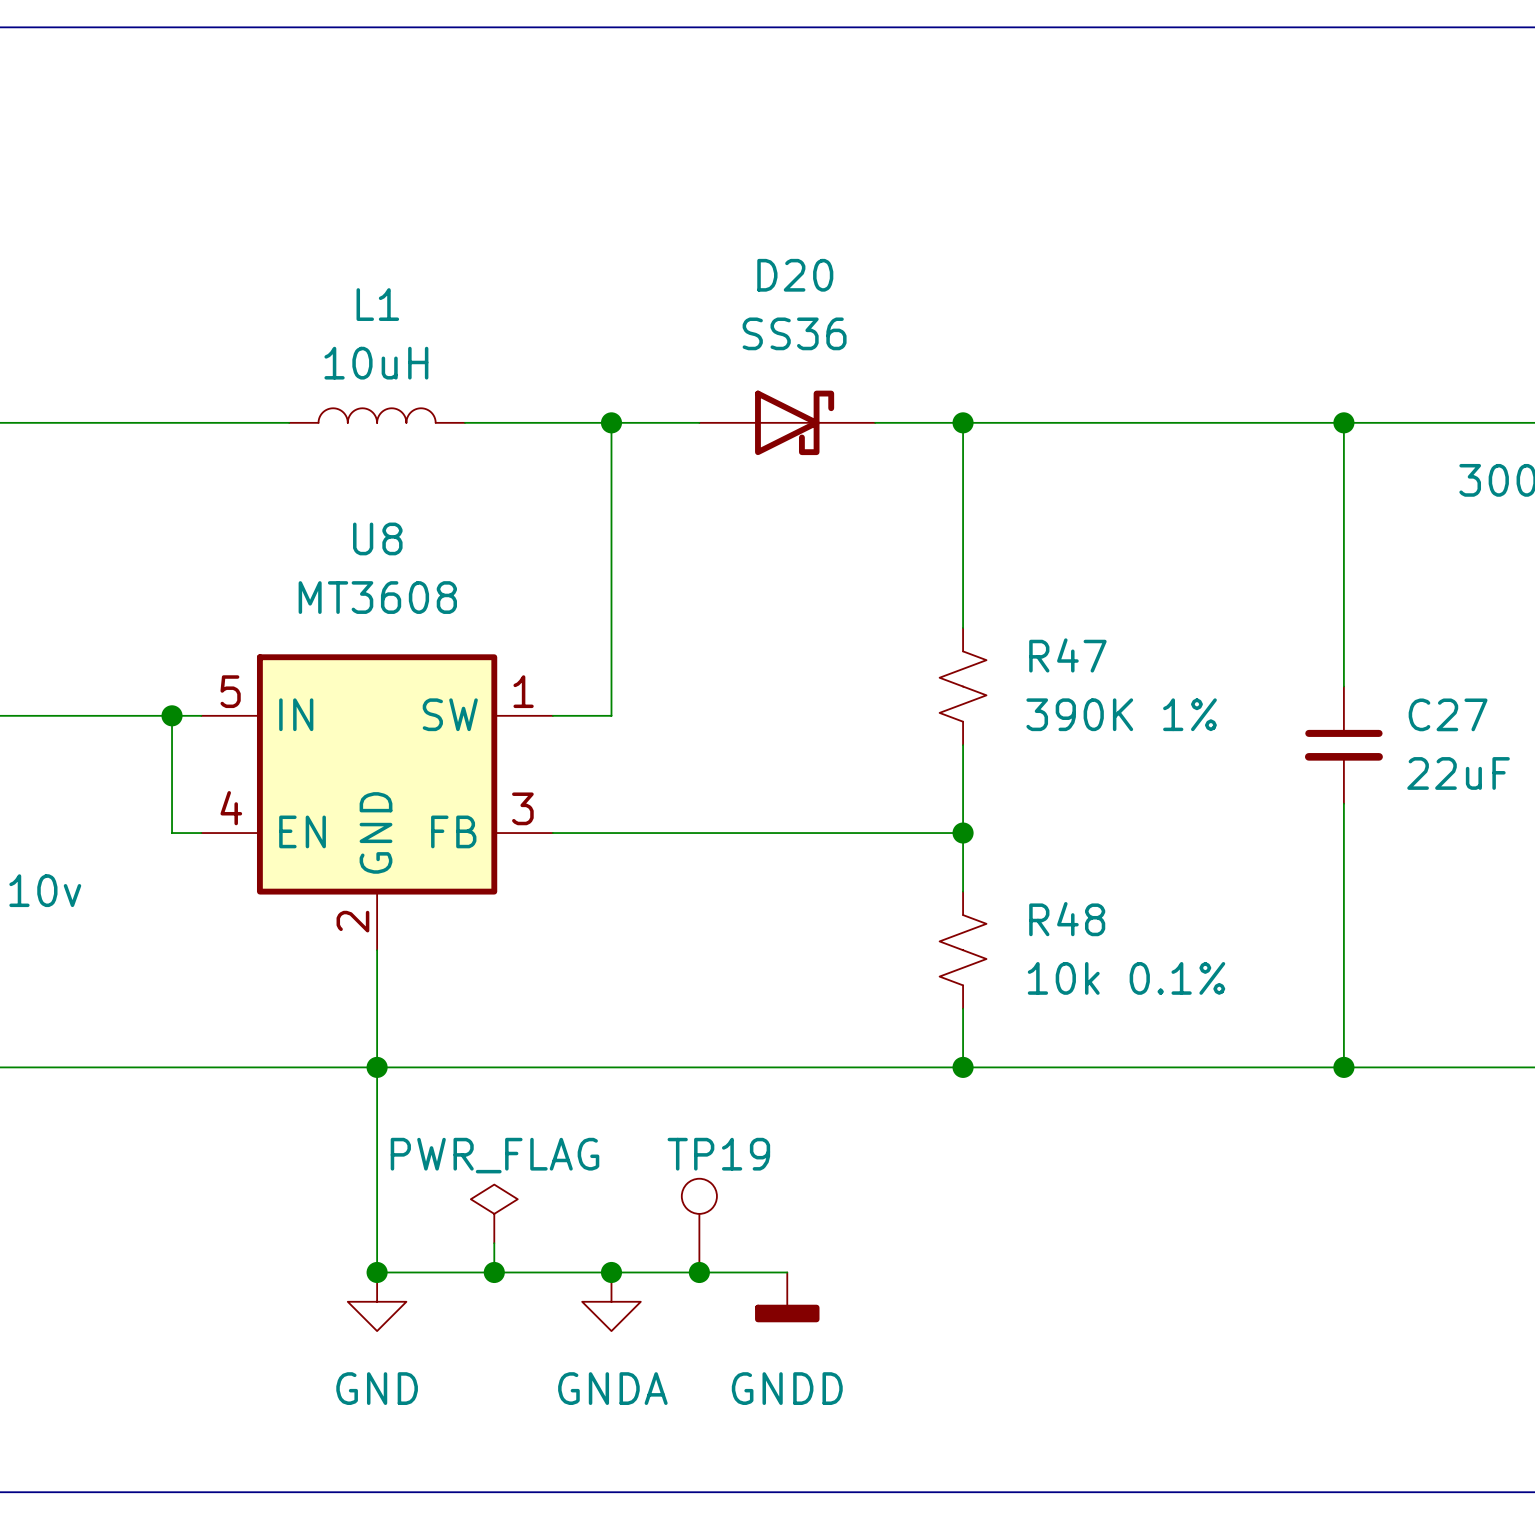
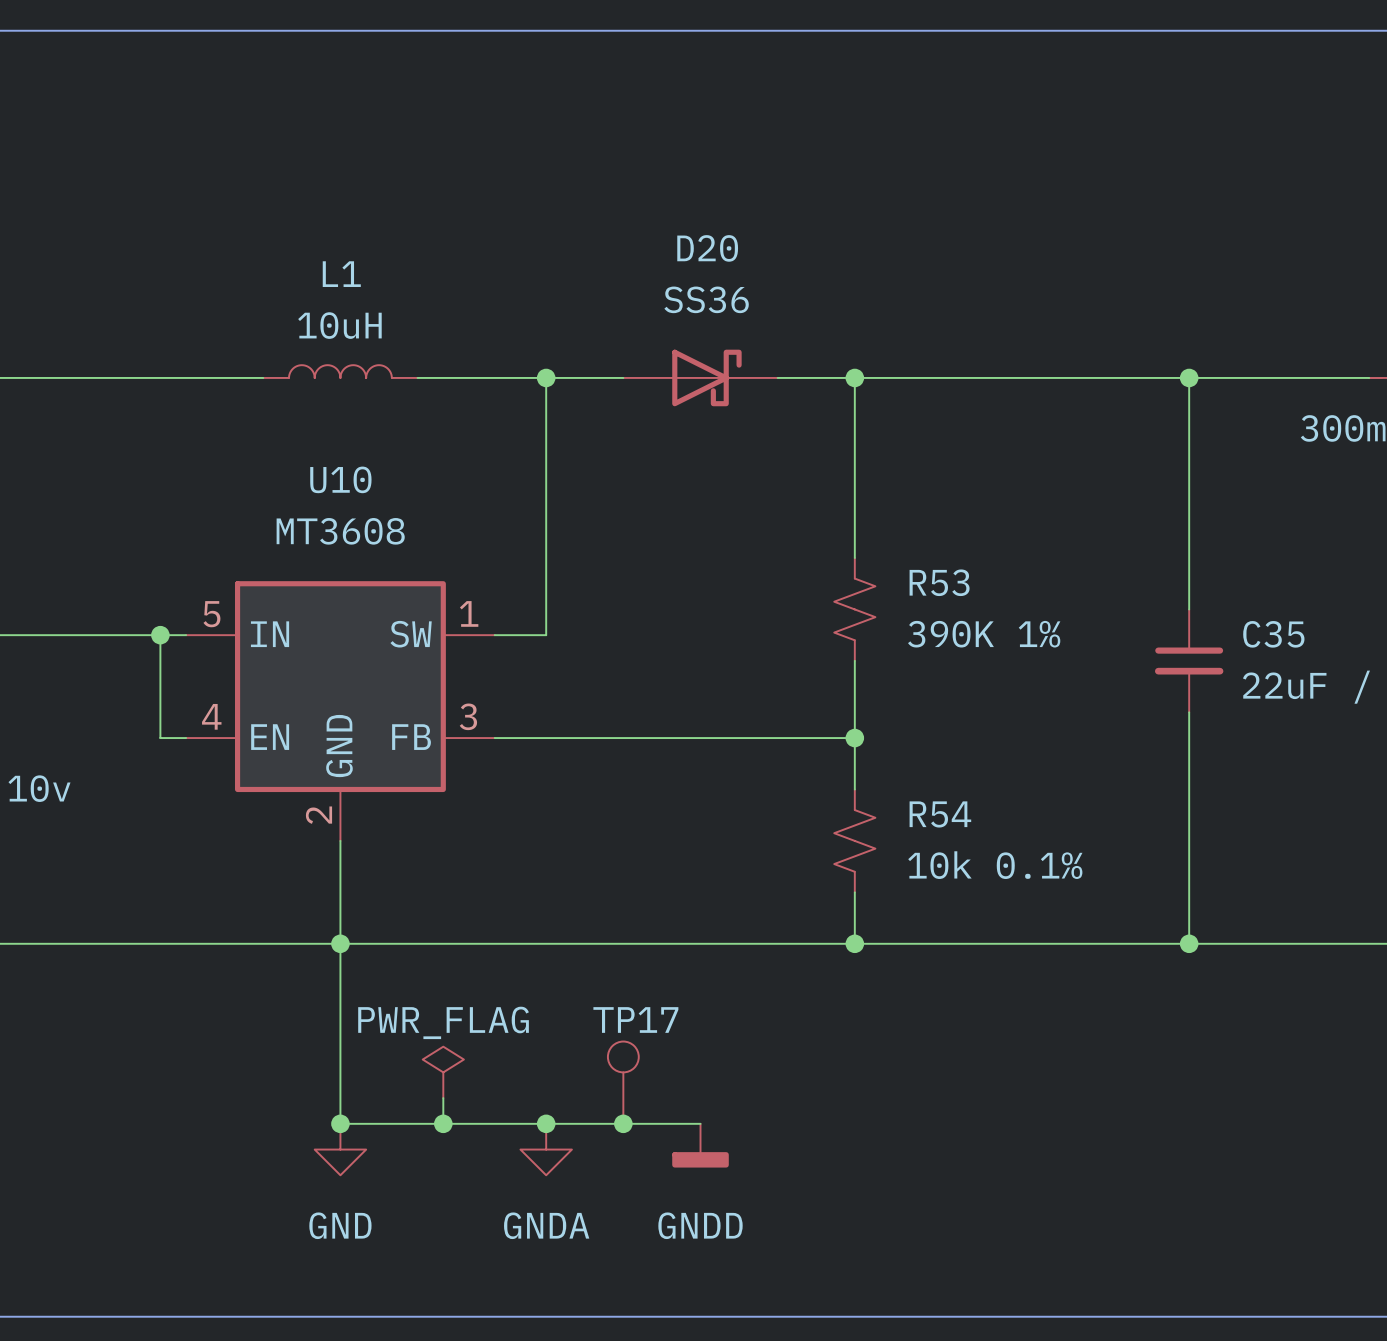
U8 name: U8 (377, 538) -> U10 (340, 479)
R47 name: R47 (1067, 655) -> R53 (939, 582)
C27 name: C27 (1448, 714) -> C35 (1273, 634)
R48 name: R48 (1067, 919) -> R54 (940, 814)
TP19 name: TP19 (718, 1154) -> TP17 (635, 1019)

